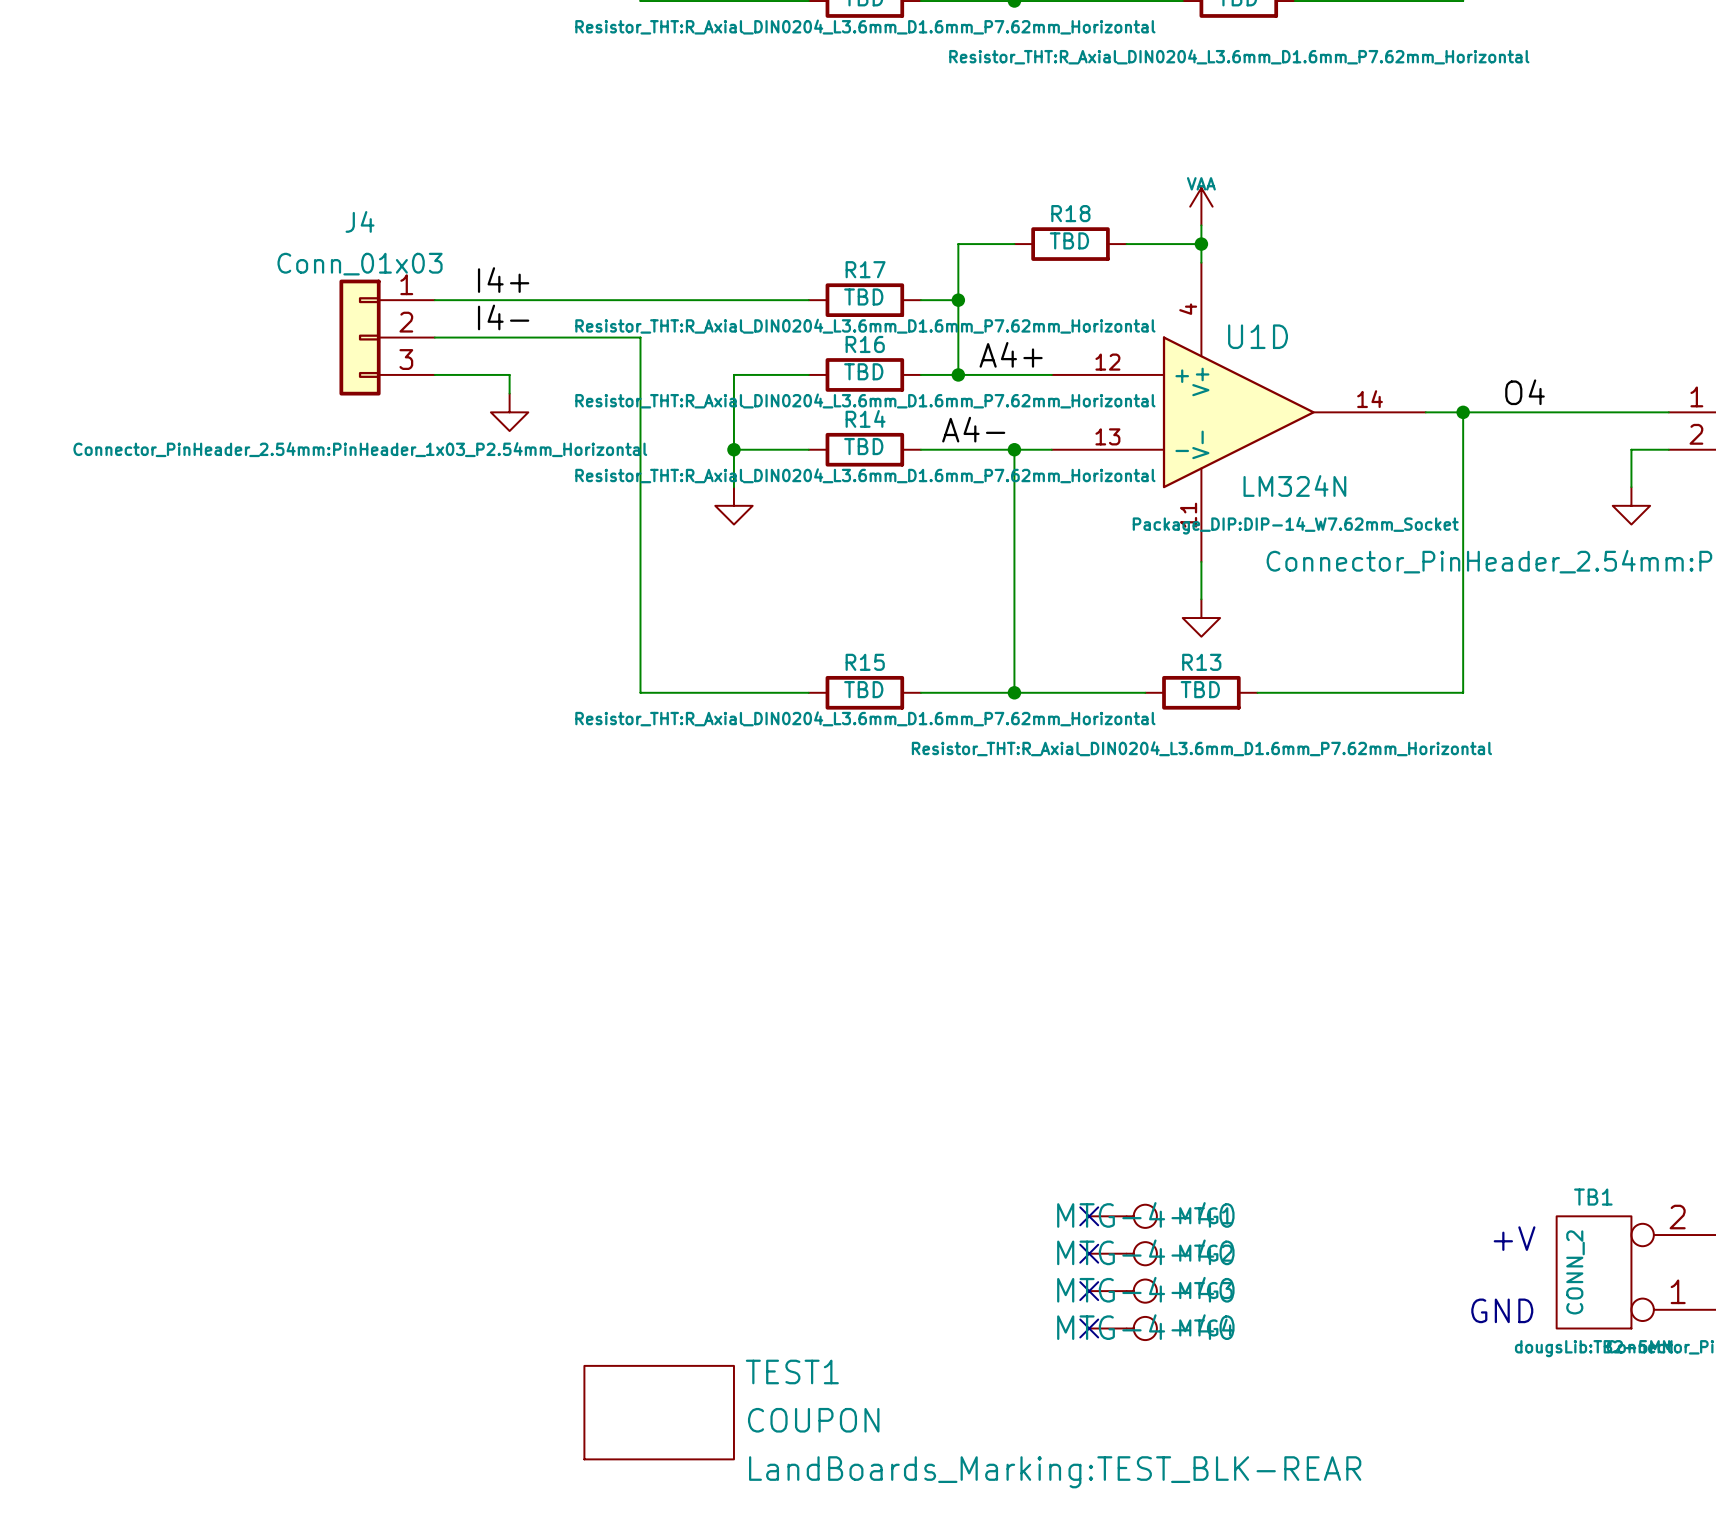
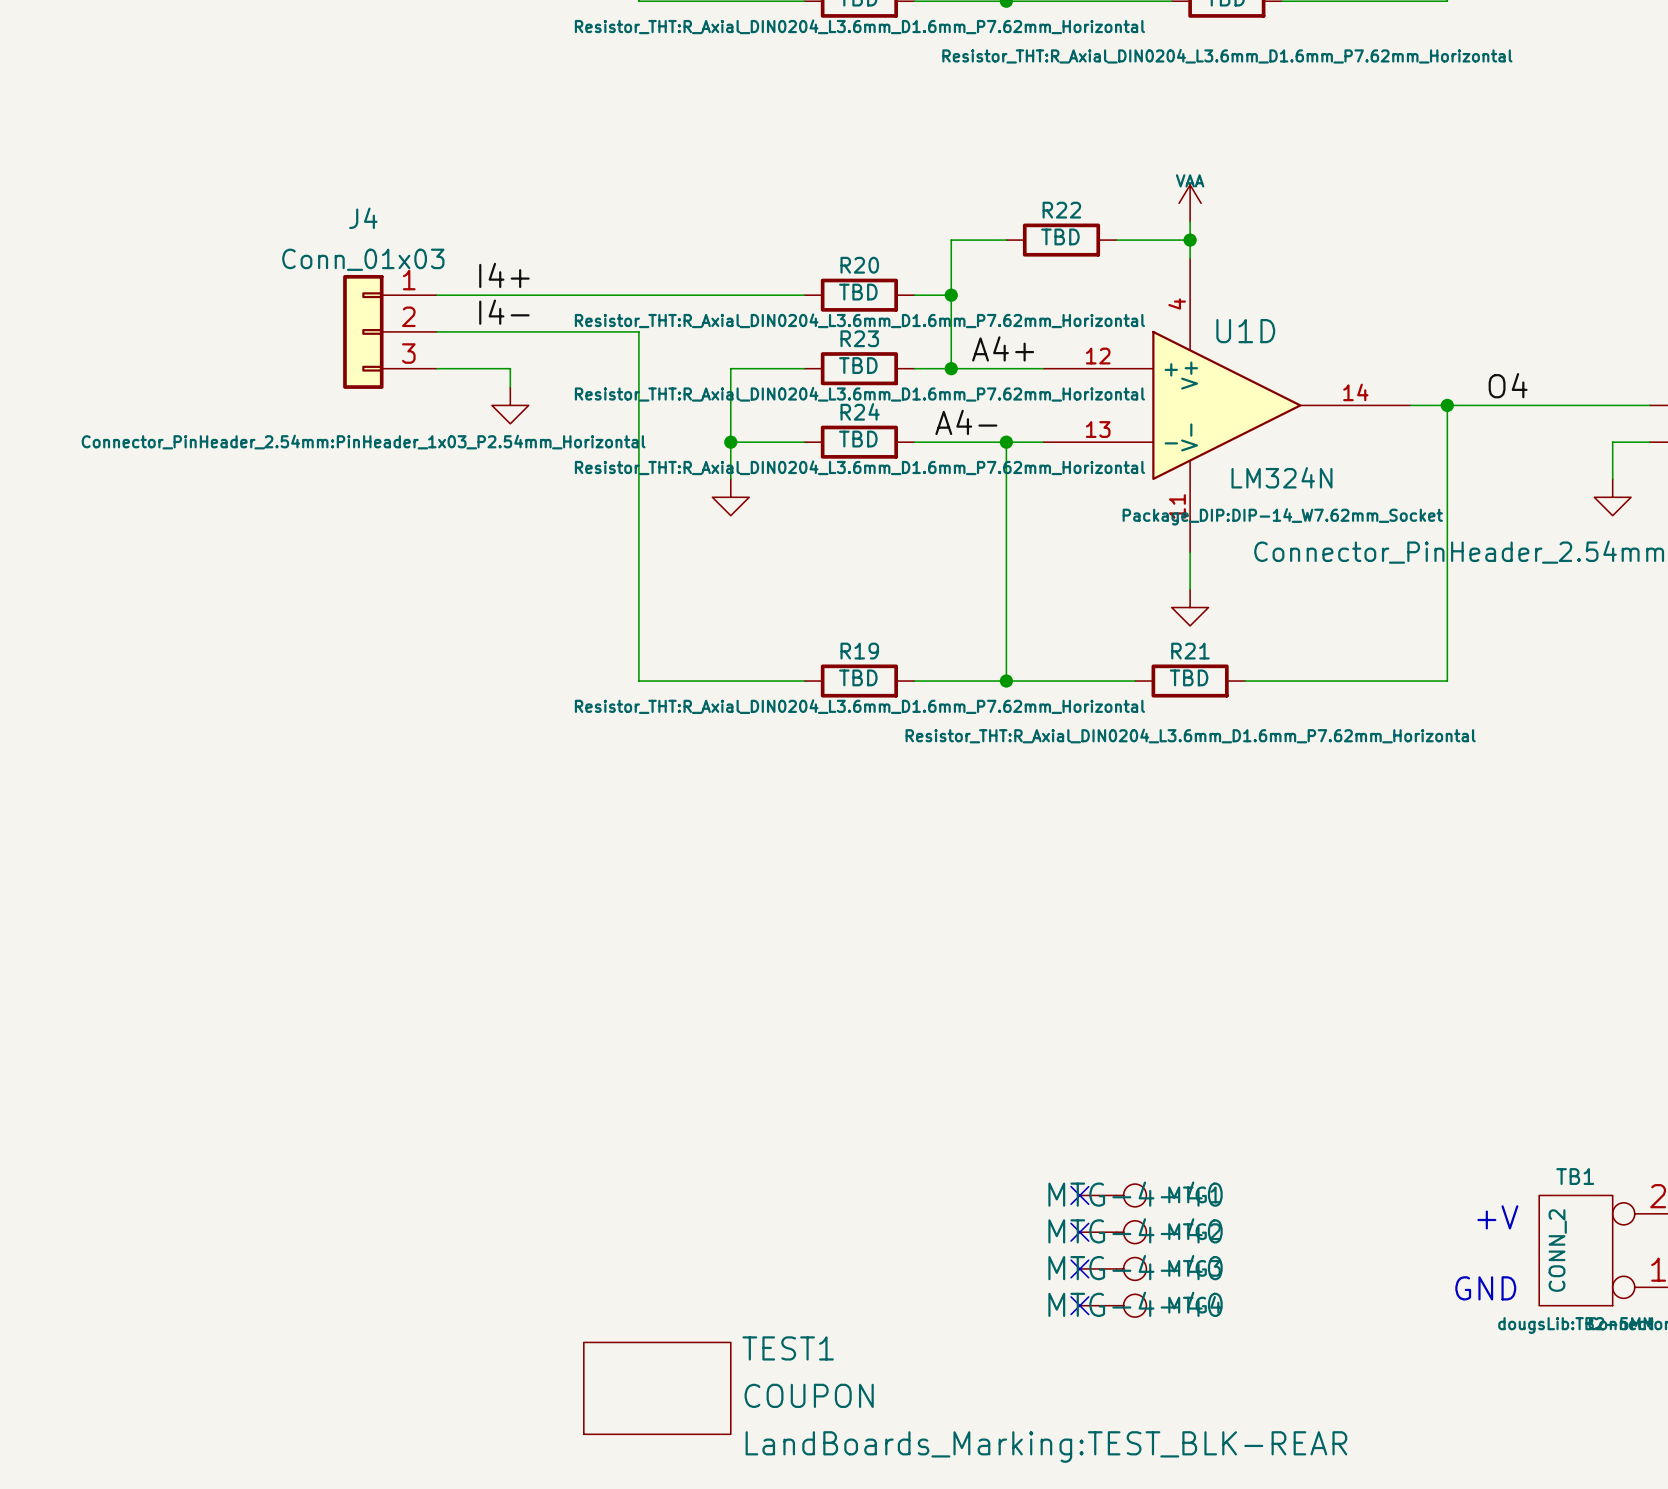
R18 name: R18 (1070, 213) -> R22 (1061, 210)
R17 name: R17 (865, 269) -> R20 (859, 265)
R16 name: R16 (865, 344) -> R23 (859, 338)
R14 name: R14 (865, 418) -> R24 (860, 411)
R15 name: R15 (865, 662) -> R19 (859, 651)
R13 name: R13 (1201, 662) -> R21 (1190, 651)

